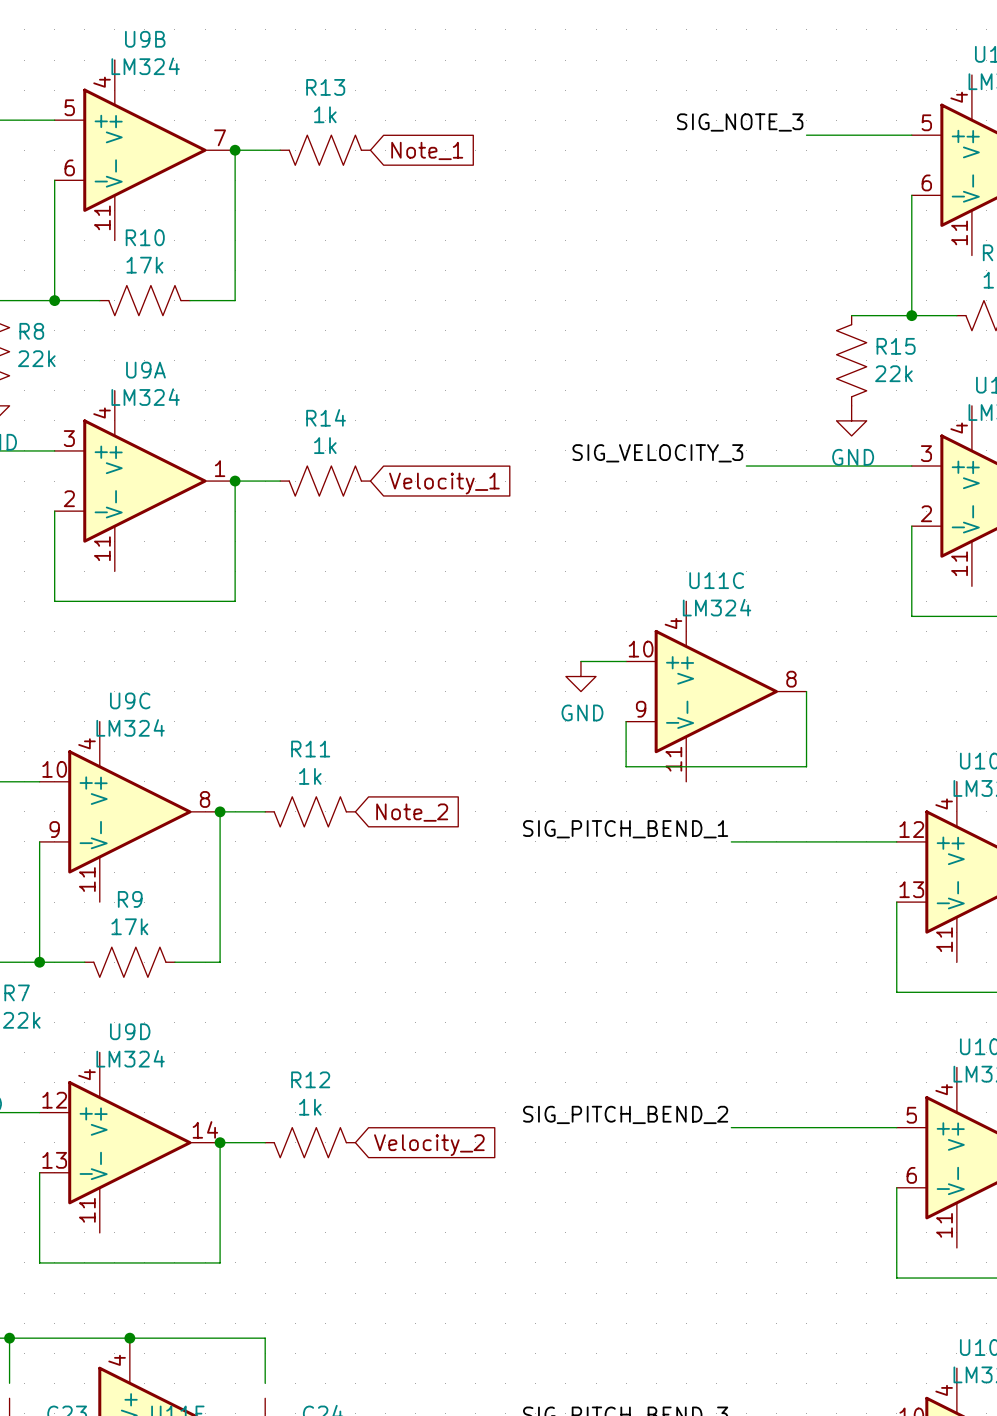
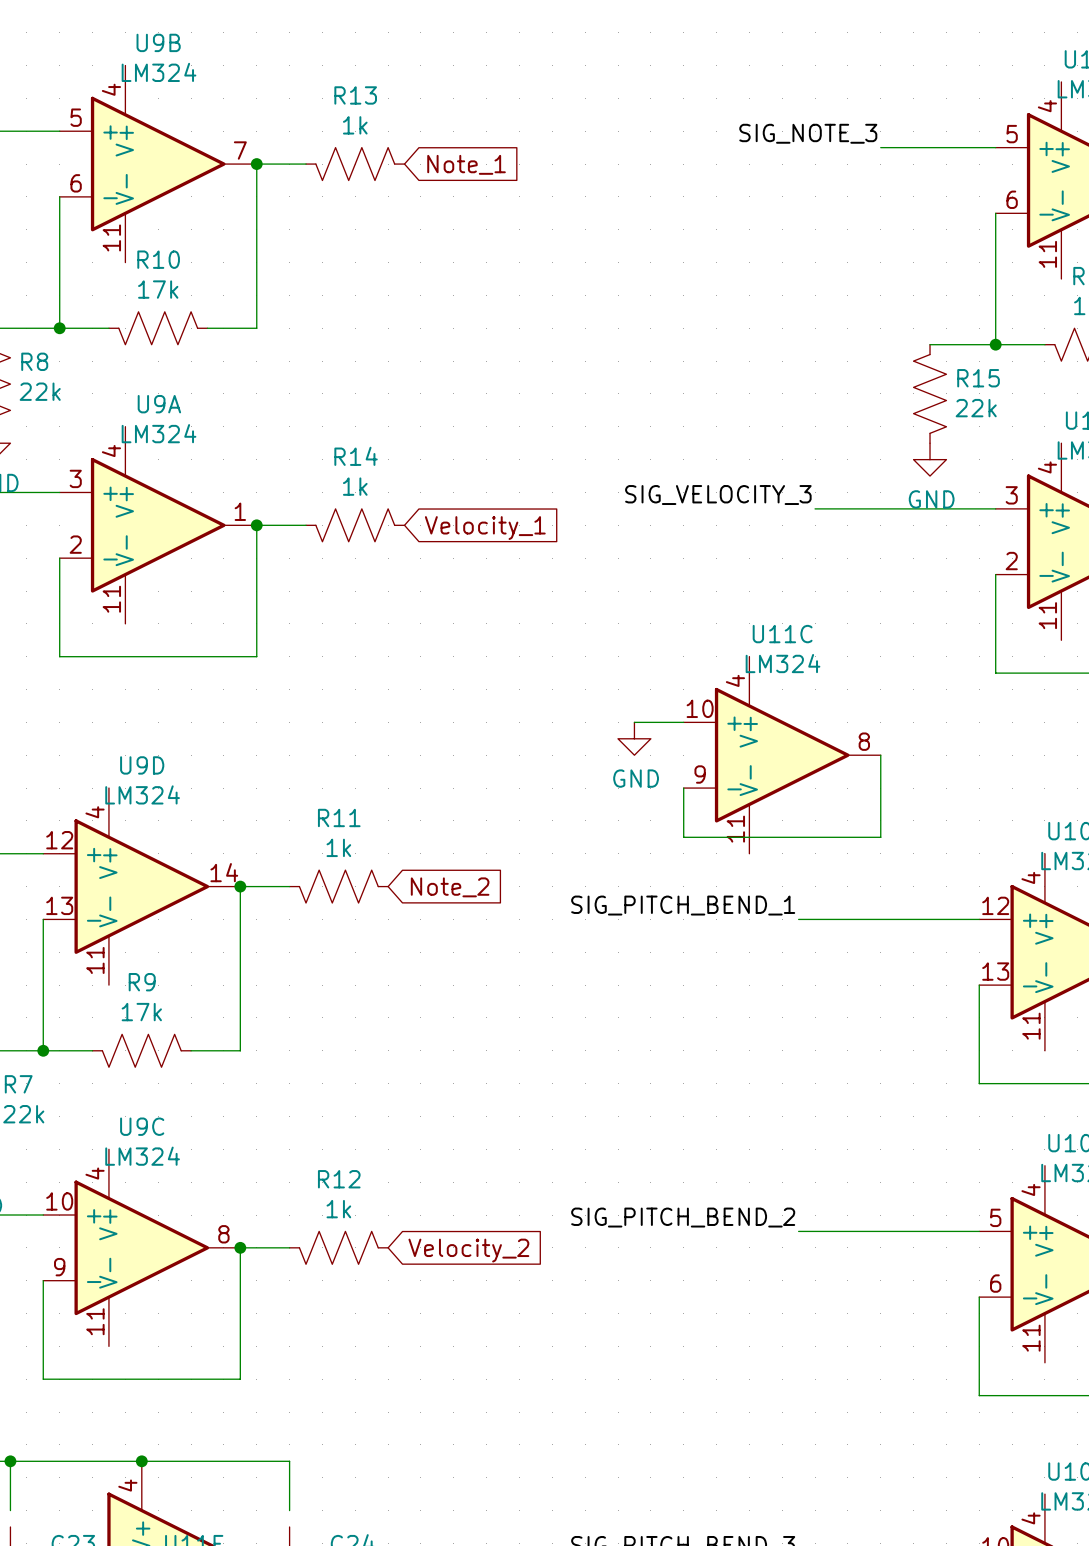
U9C position: (129, 811) -> (141, 1247)
U9D position: (129, 1142) -> (141, 886)

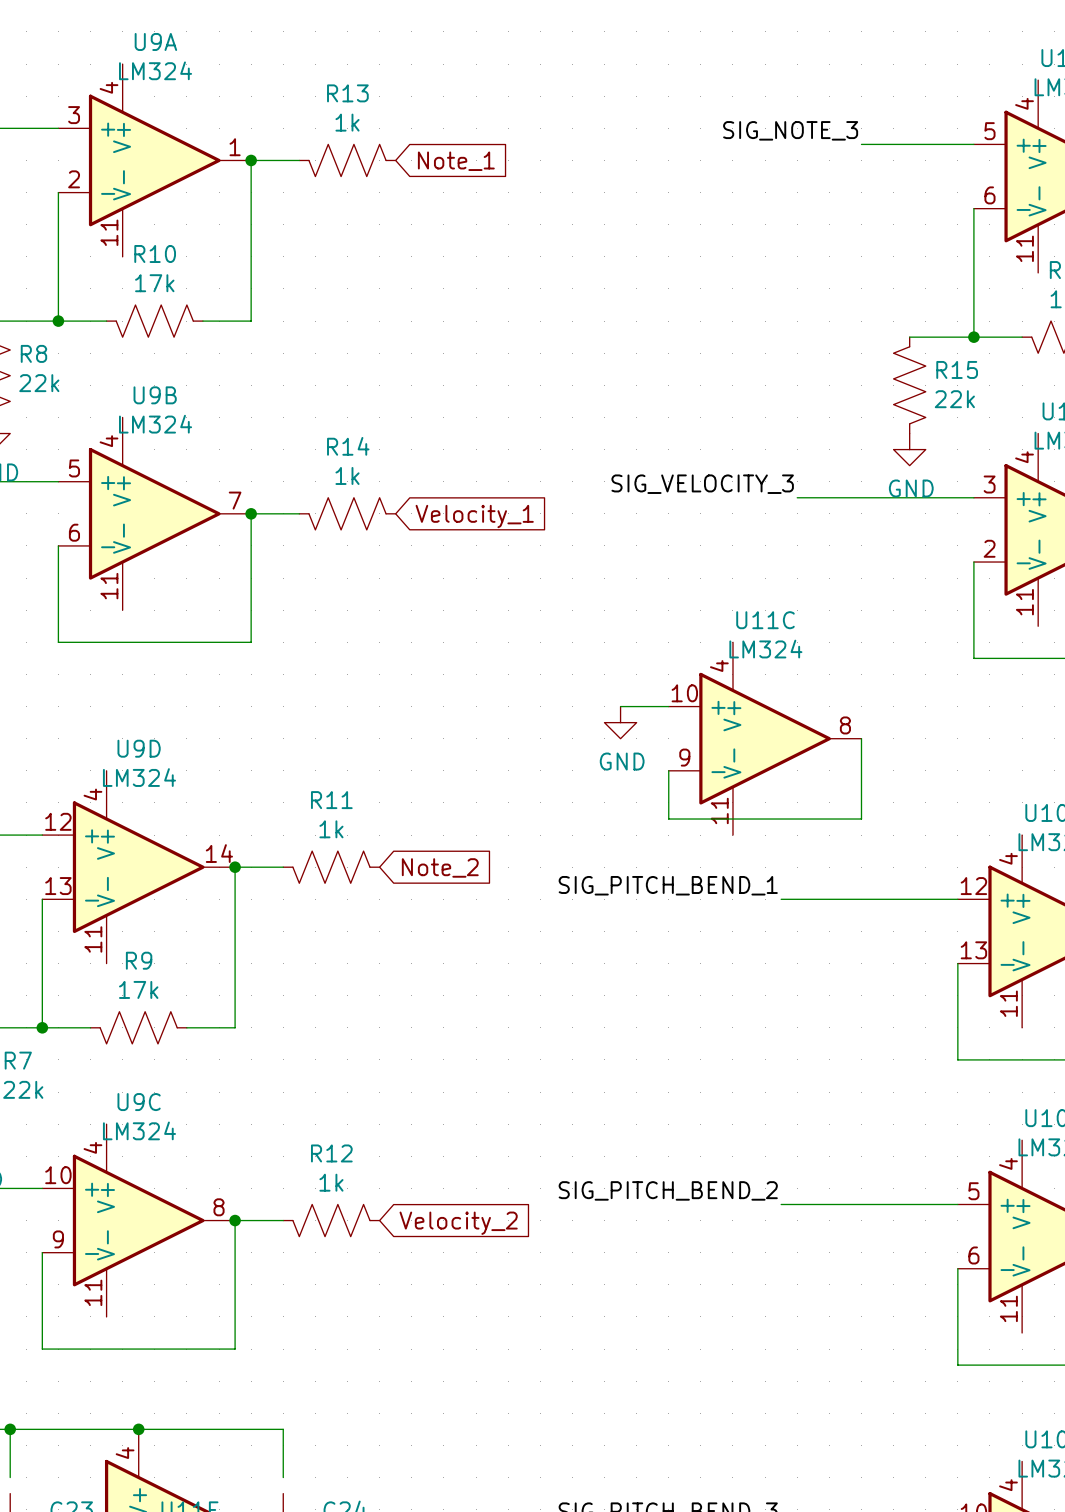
U9B position: (158, 164) -> (154, 513)
U9A position: (158, 525) -> (154, 160)

